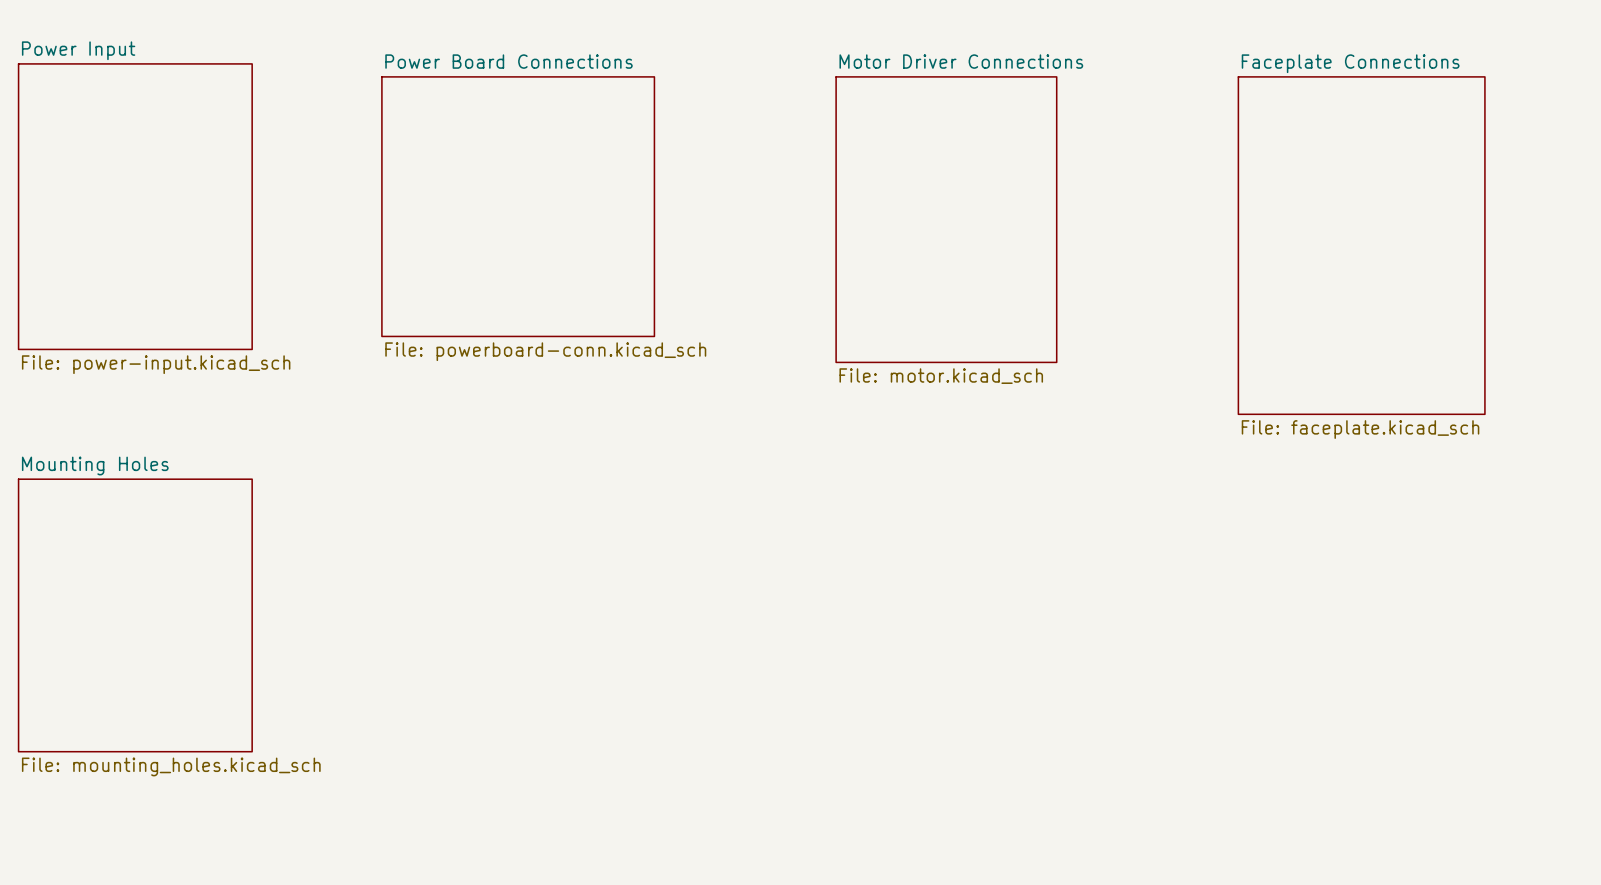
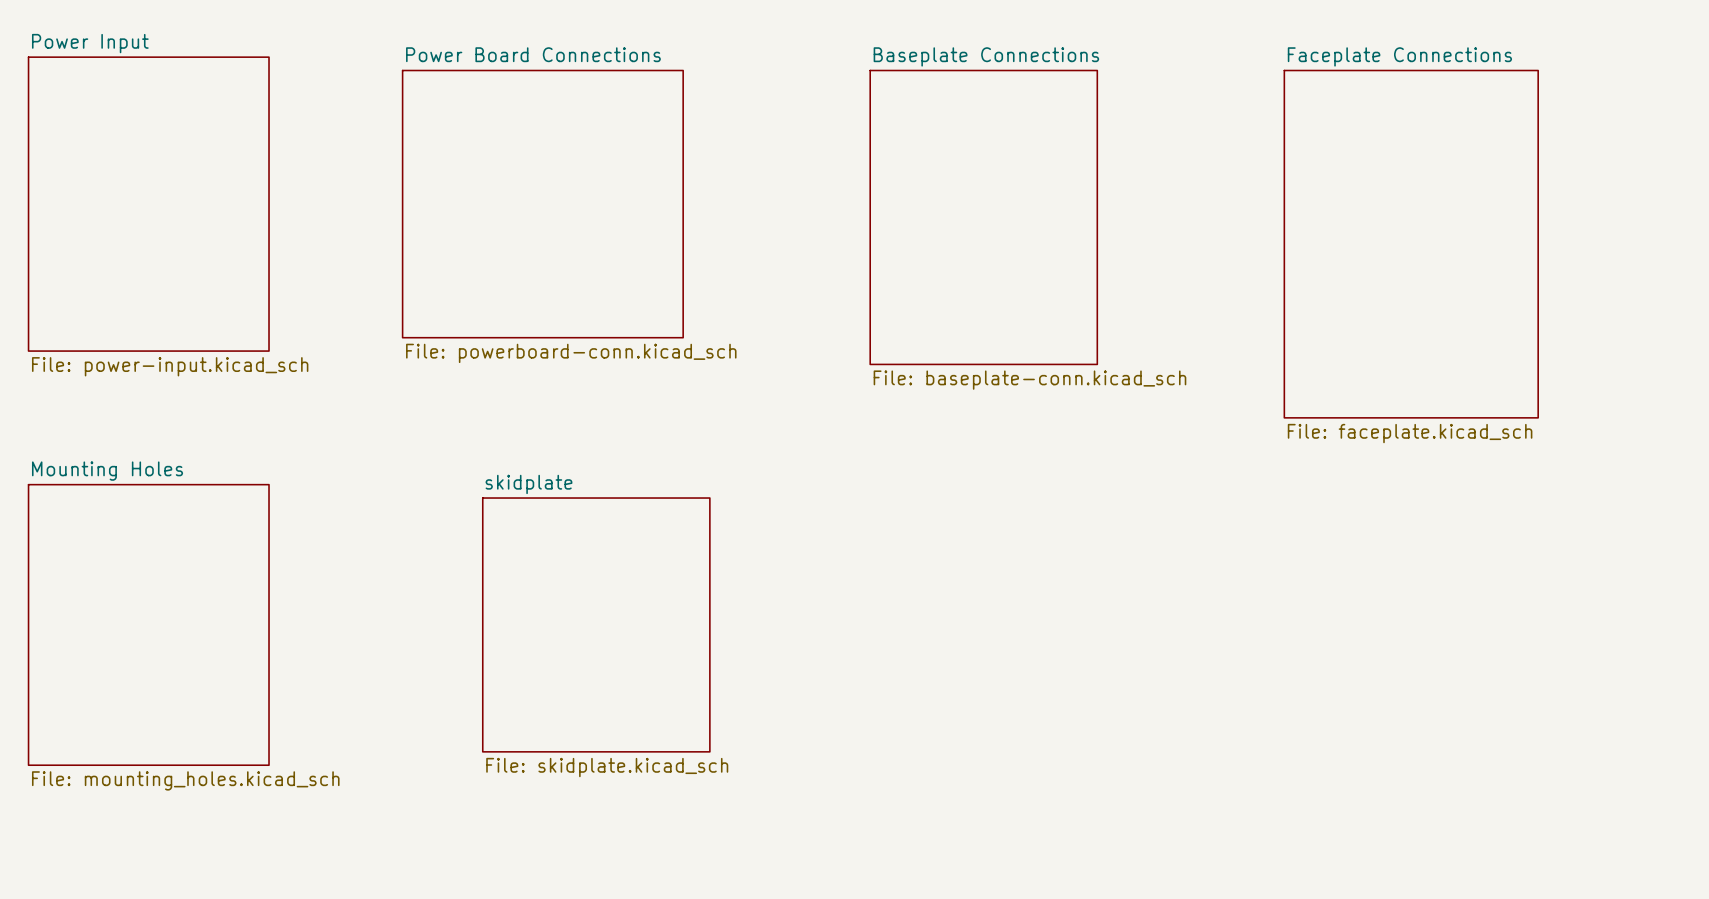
sheet Motor Driver Connections name: Motor Driver Connections (961, 61) -> Baseplate Connections (986, 56)
sheet Motor Driver Connections value: File: motor.kicad_sch (941, 376) -> File: baseplate-conn.kicad_sch (1029, 380)
sheet skidplate: none -> File: skidplate.kicad_sch (596, 624)

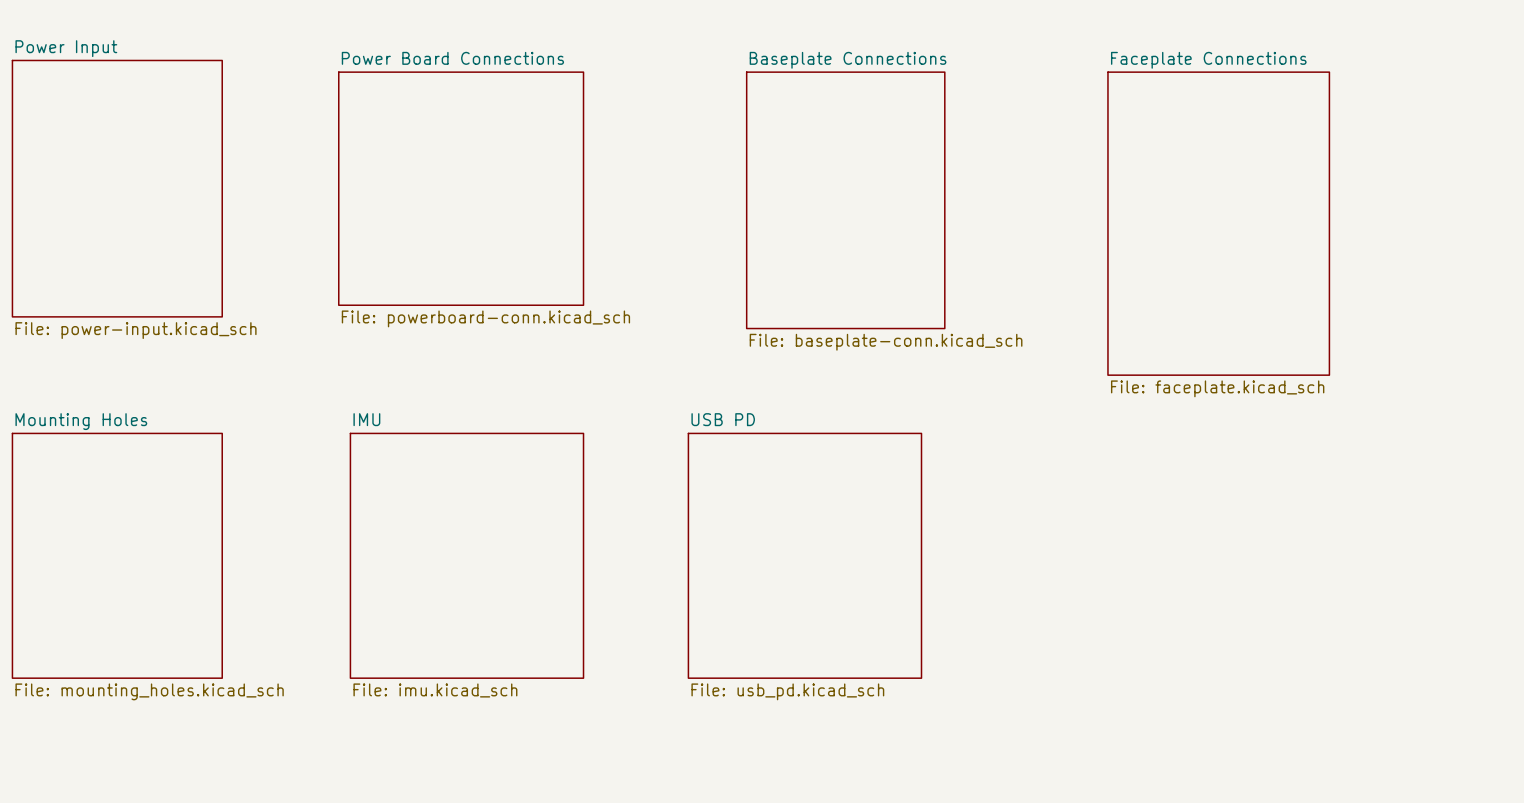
sheet IMU: none -> File: imu.kicad_sch (466, 555)
sheet skidplate: File: skidplate.kicad_sch (596, 624) -> none
sheet USB PD: none -> File: usb_pd.kicad_sch (804, 555)

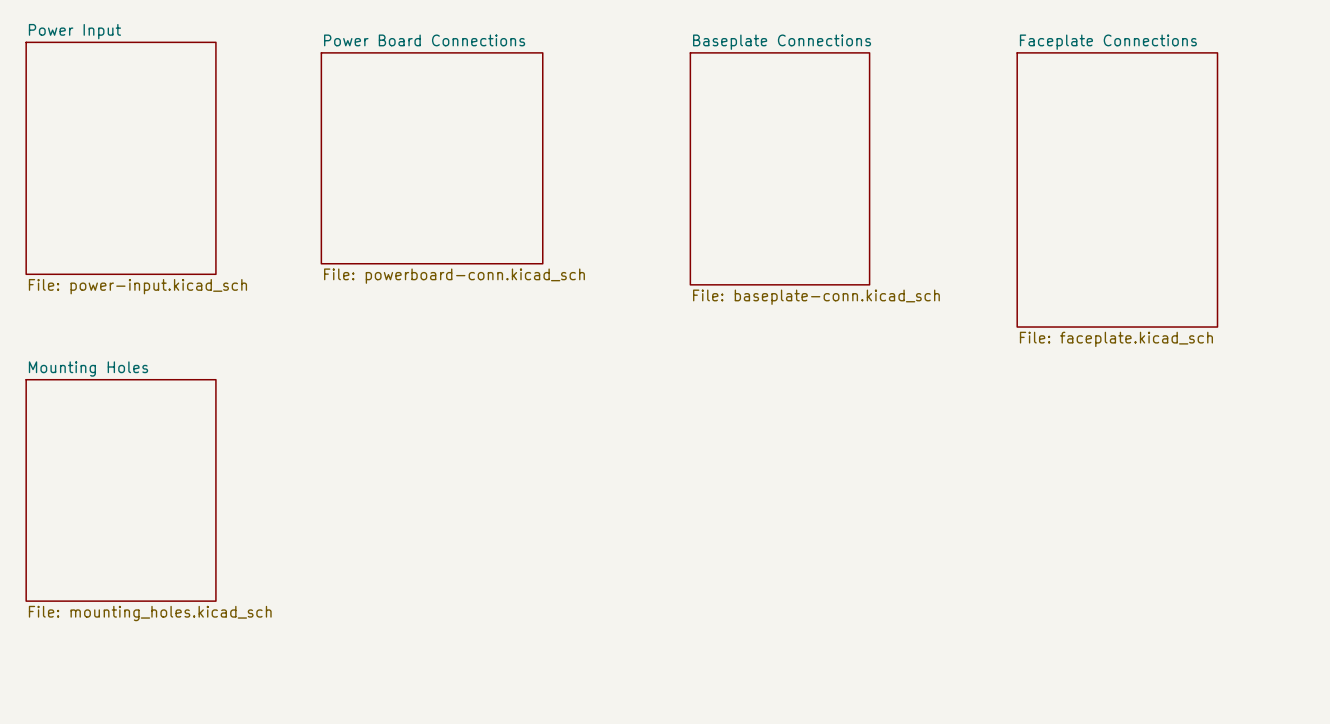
sheet IMU: File: imu.kicad_sch (466, 555) -> none
sheet USB PD: File: usb_pd.kicad_sch (804, 555) -> none

